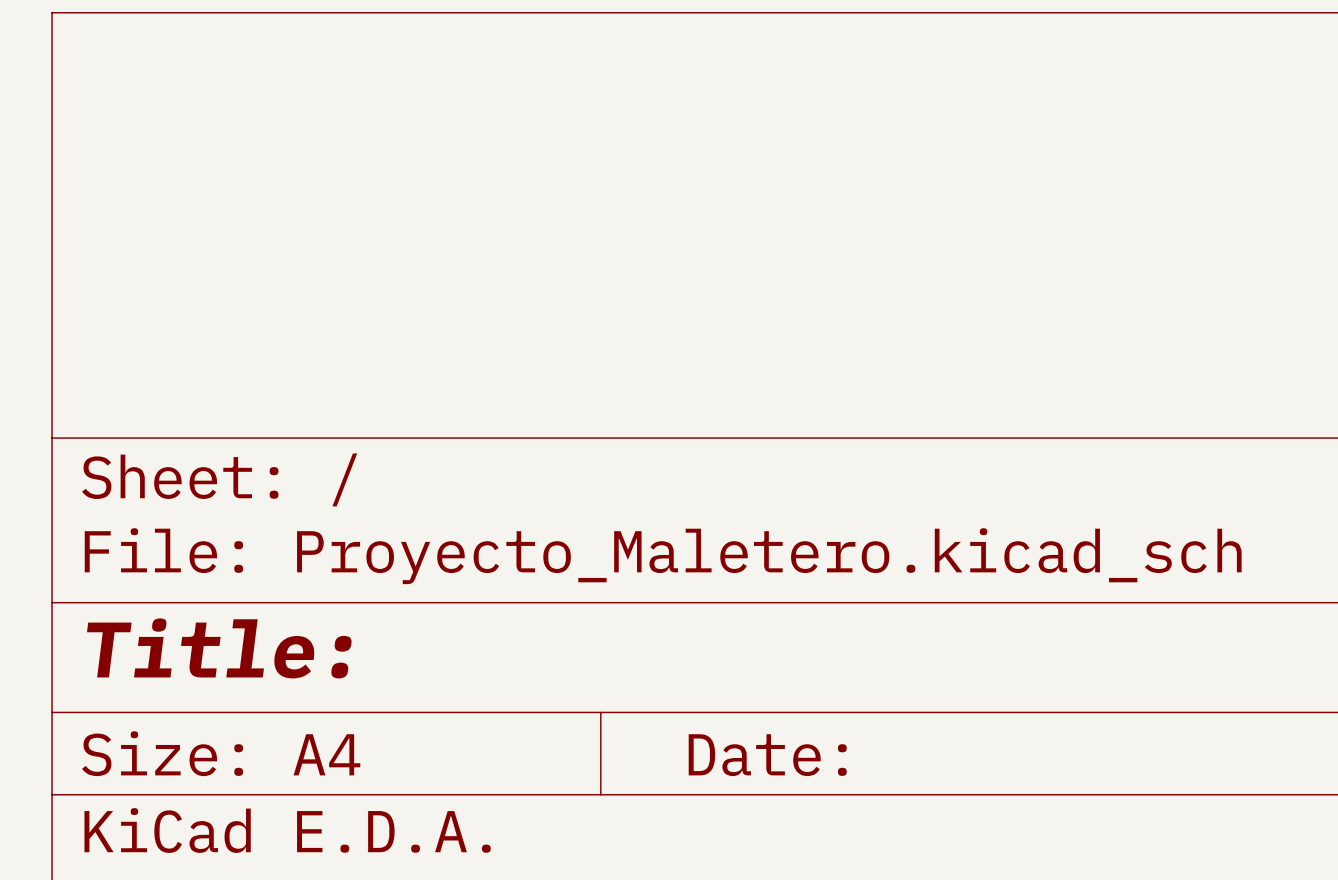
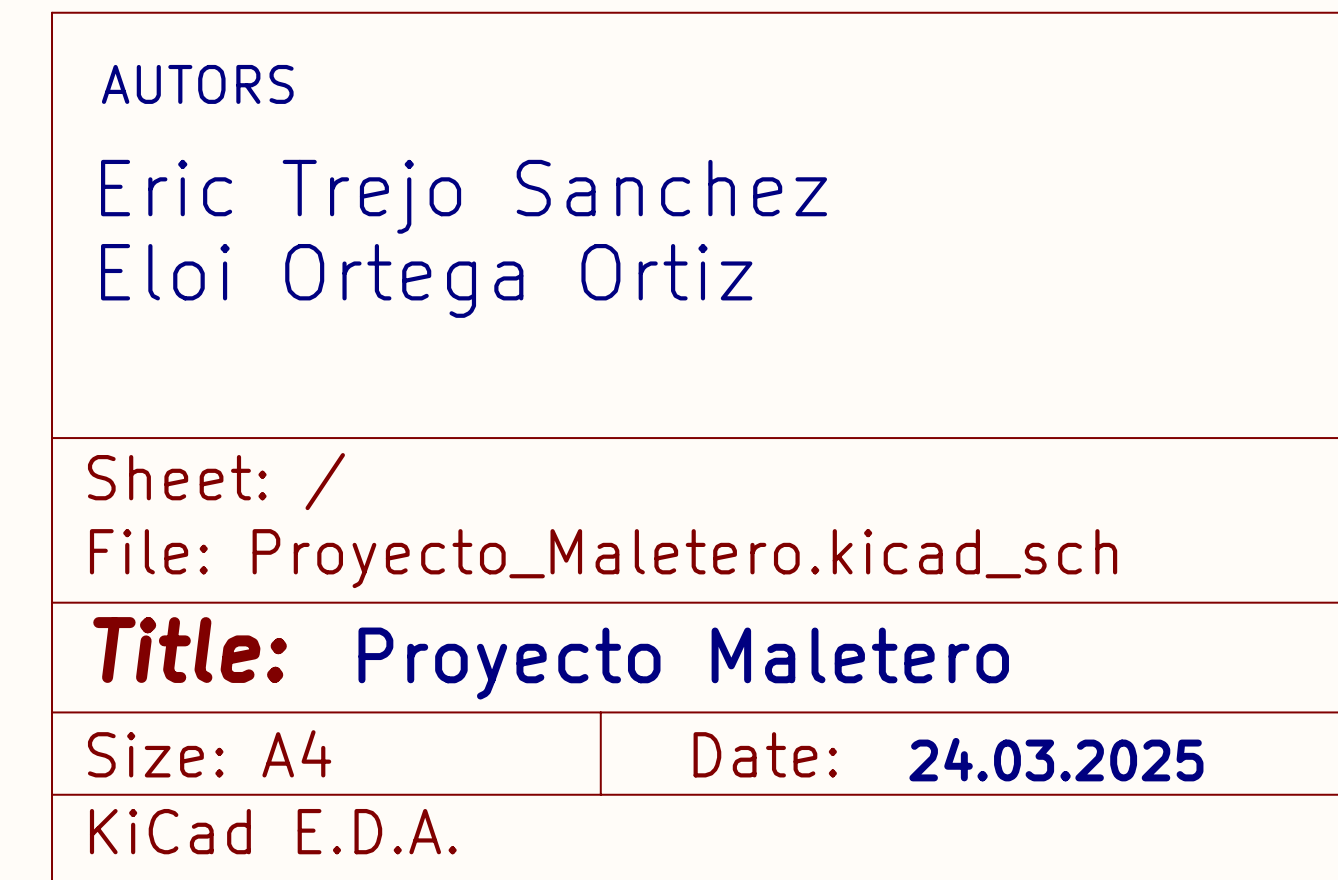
text: none -> AUTORS (197, 84)
text: none -> Eric Trejo Sanchez (464, 196)
text: none -> Eloi Ortega Ortiz (426, 280)
text: none -> Proyecto Maletero (683, 663)
text: none -> 24.03.2025 (1056, 759)

